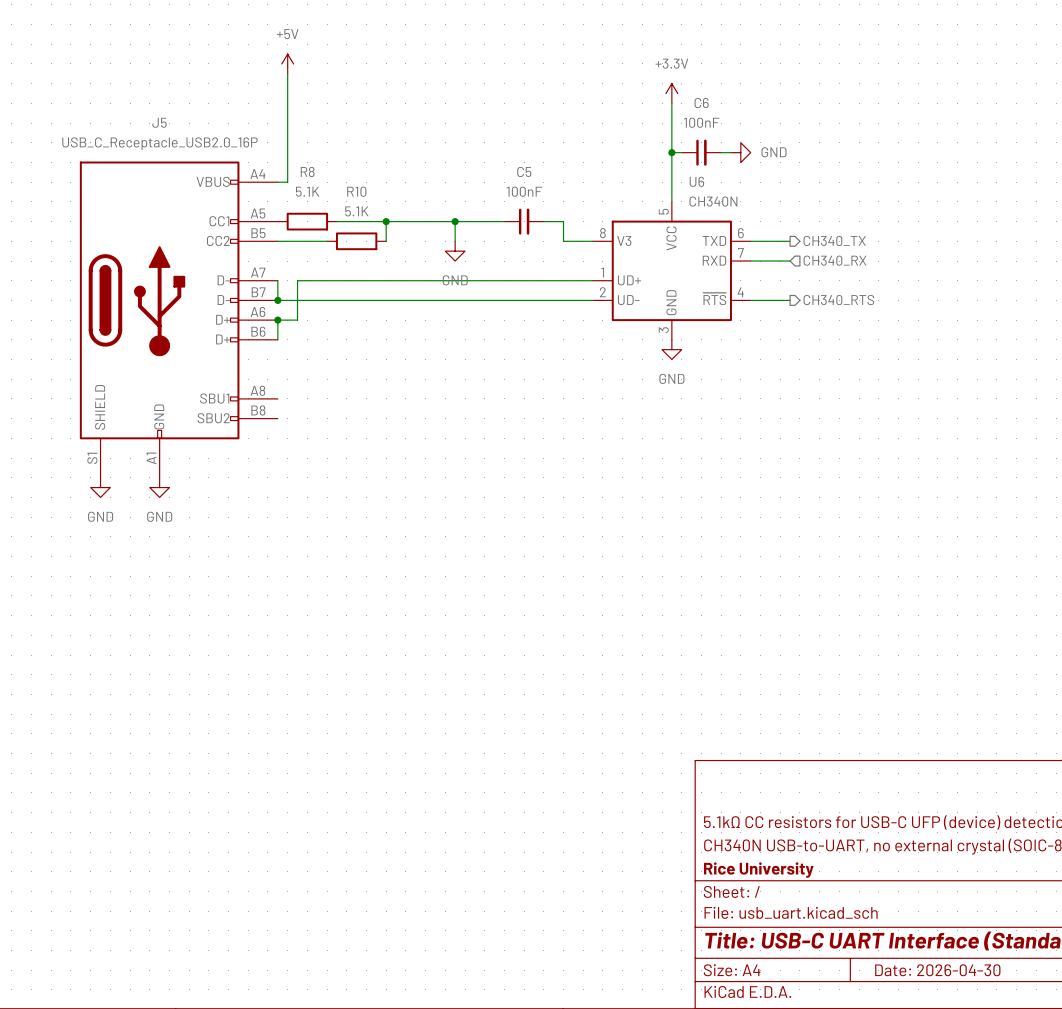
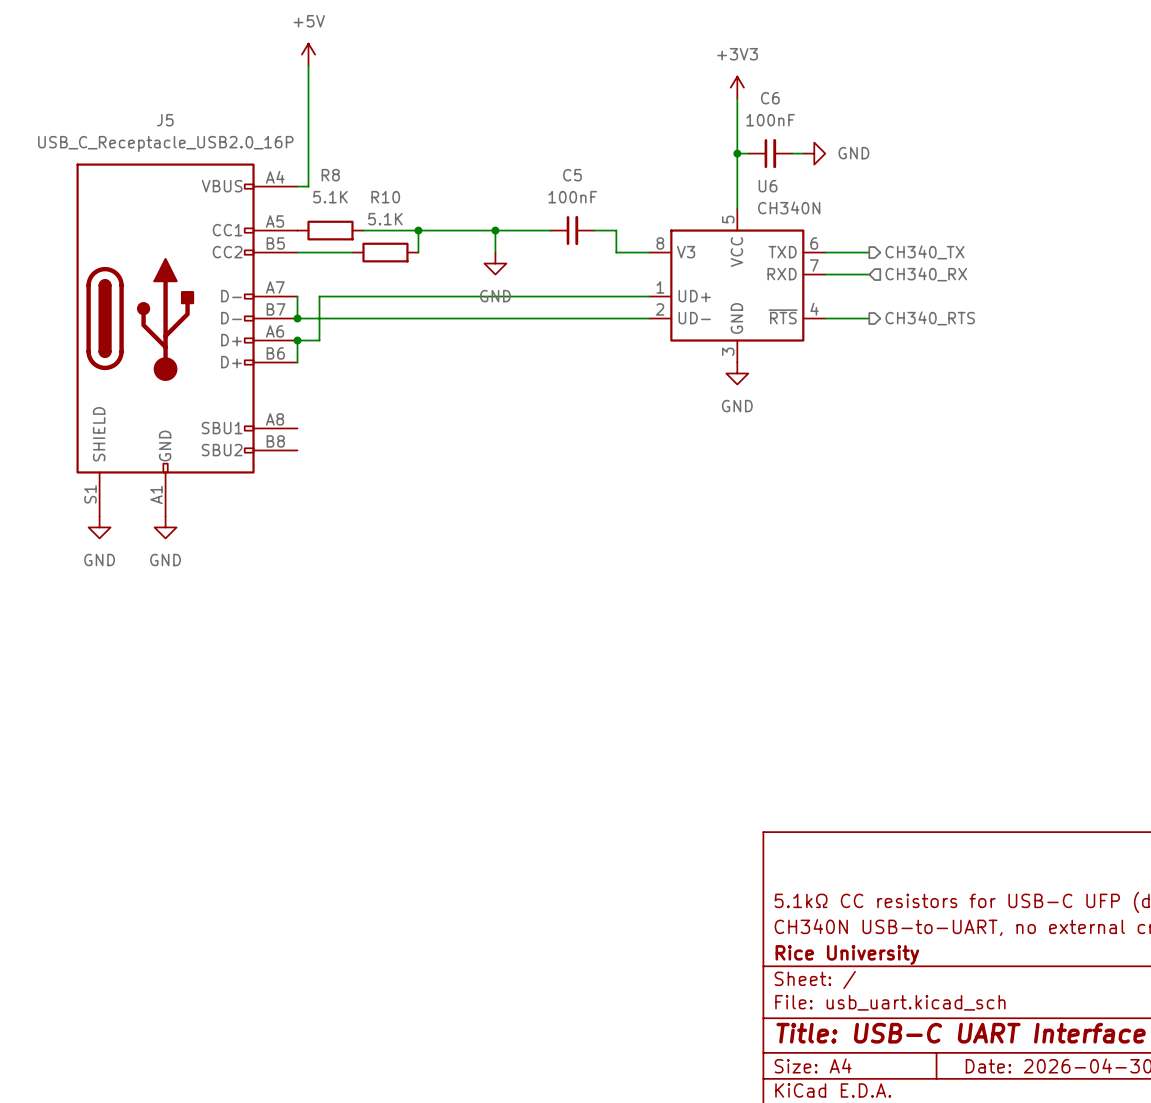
power symbol: +3.3V (671, 93) -> +3V3 (737, 87)

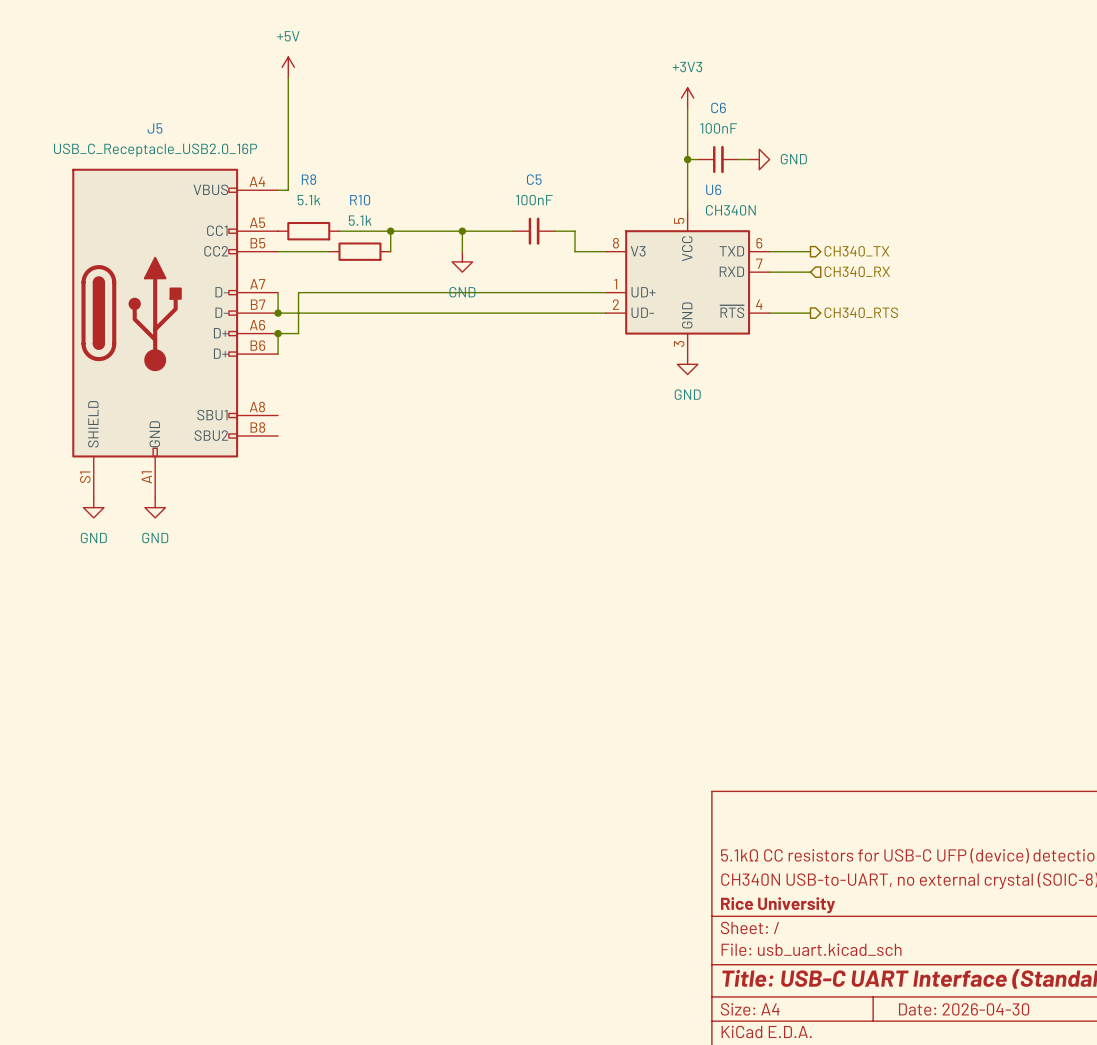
R8 value: 5.1K (330, 197) -> 5.1k (309, 200)
R10 value: 5.1K (385, 219) -> 5.1k (360, 220)

